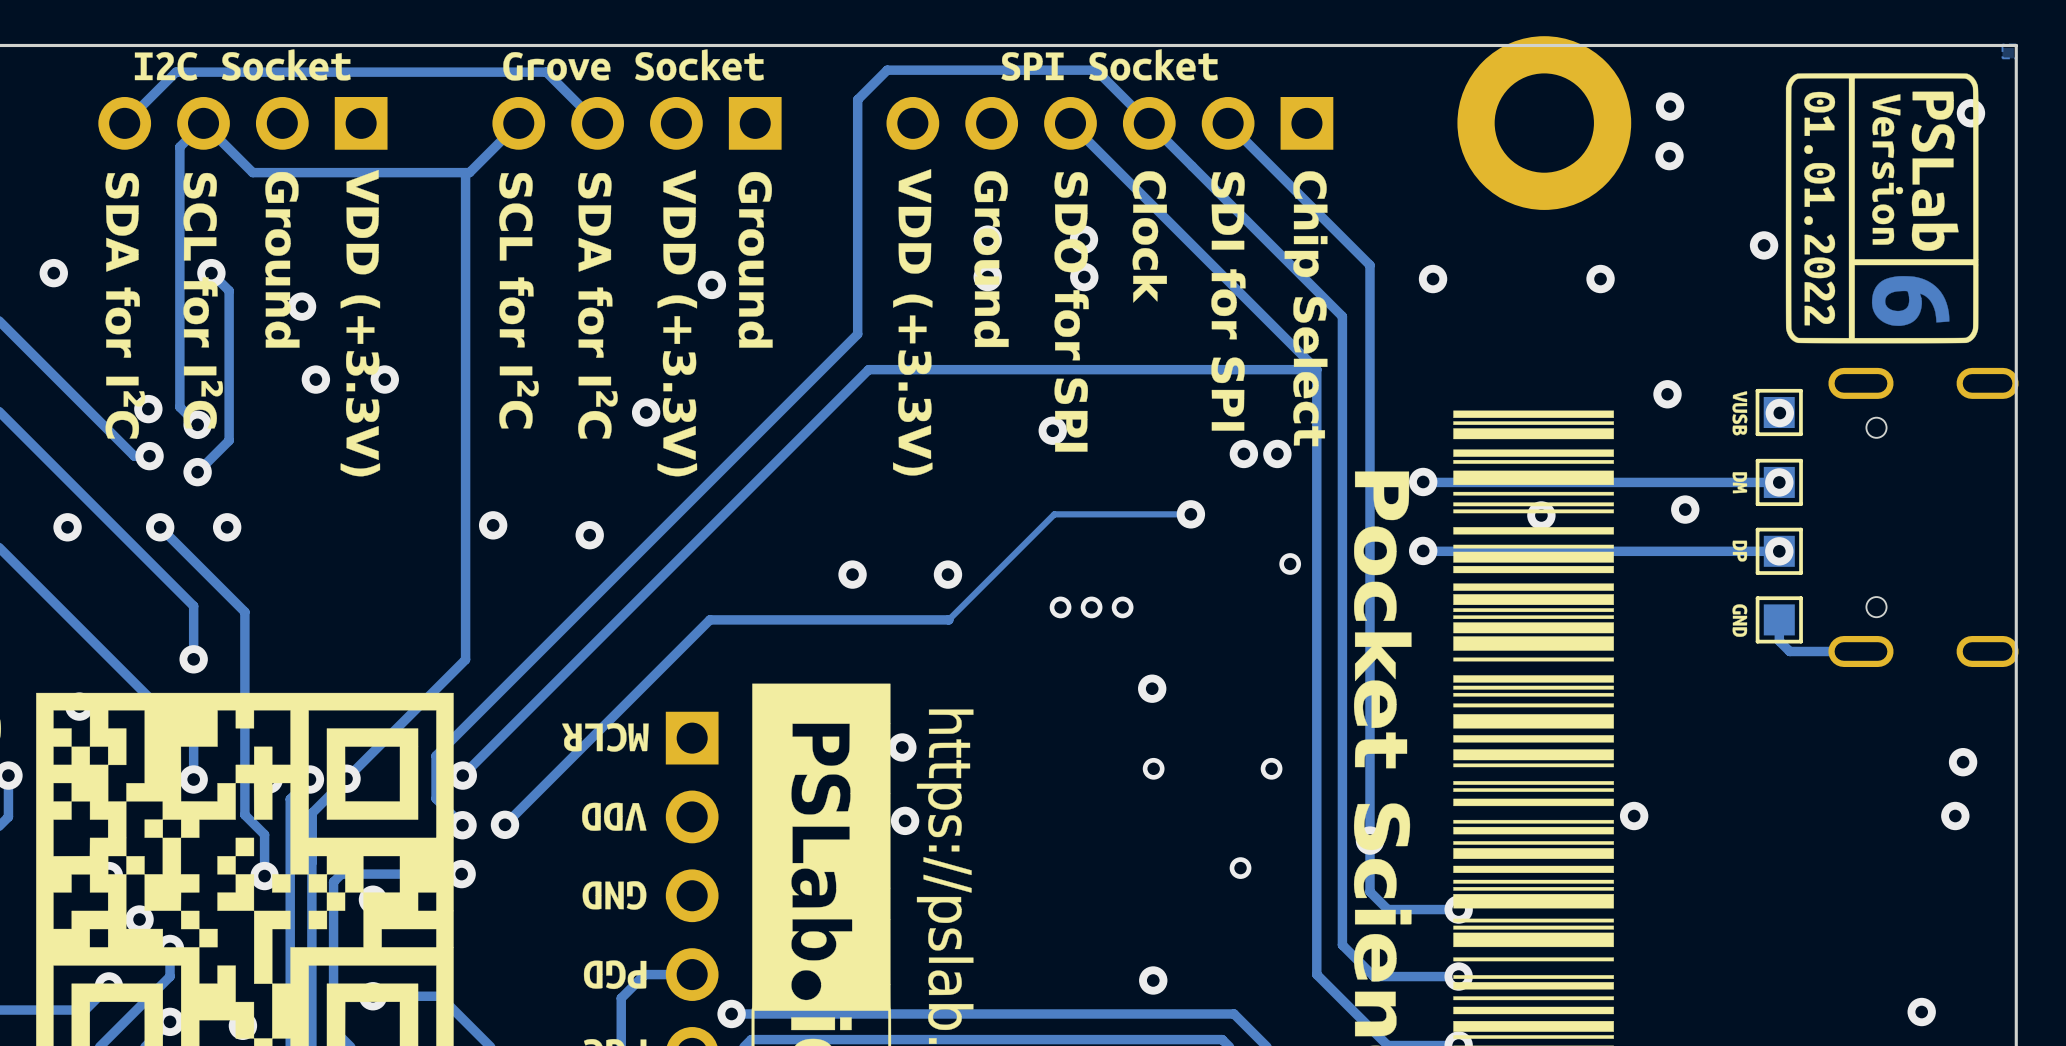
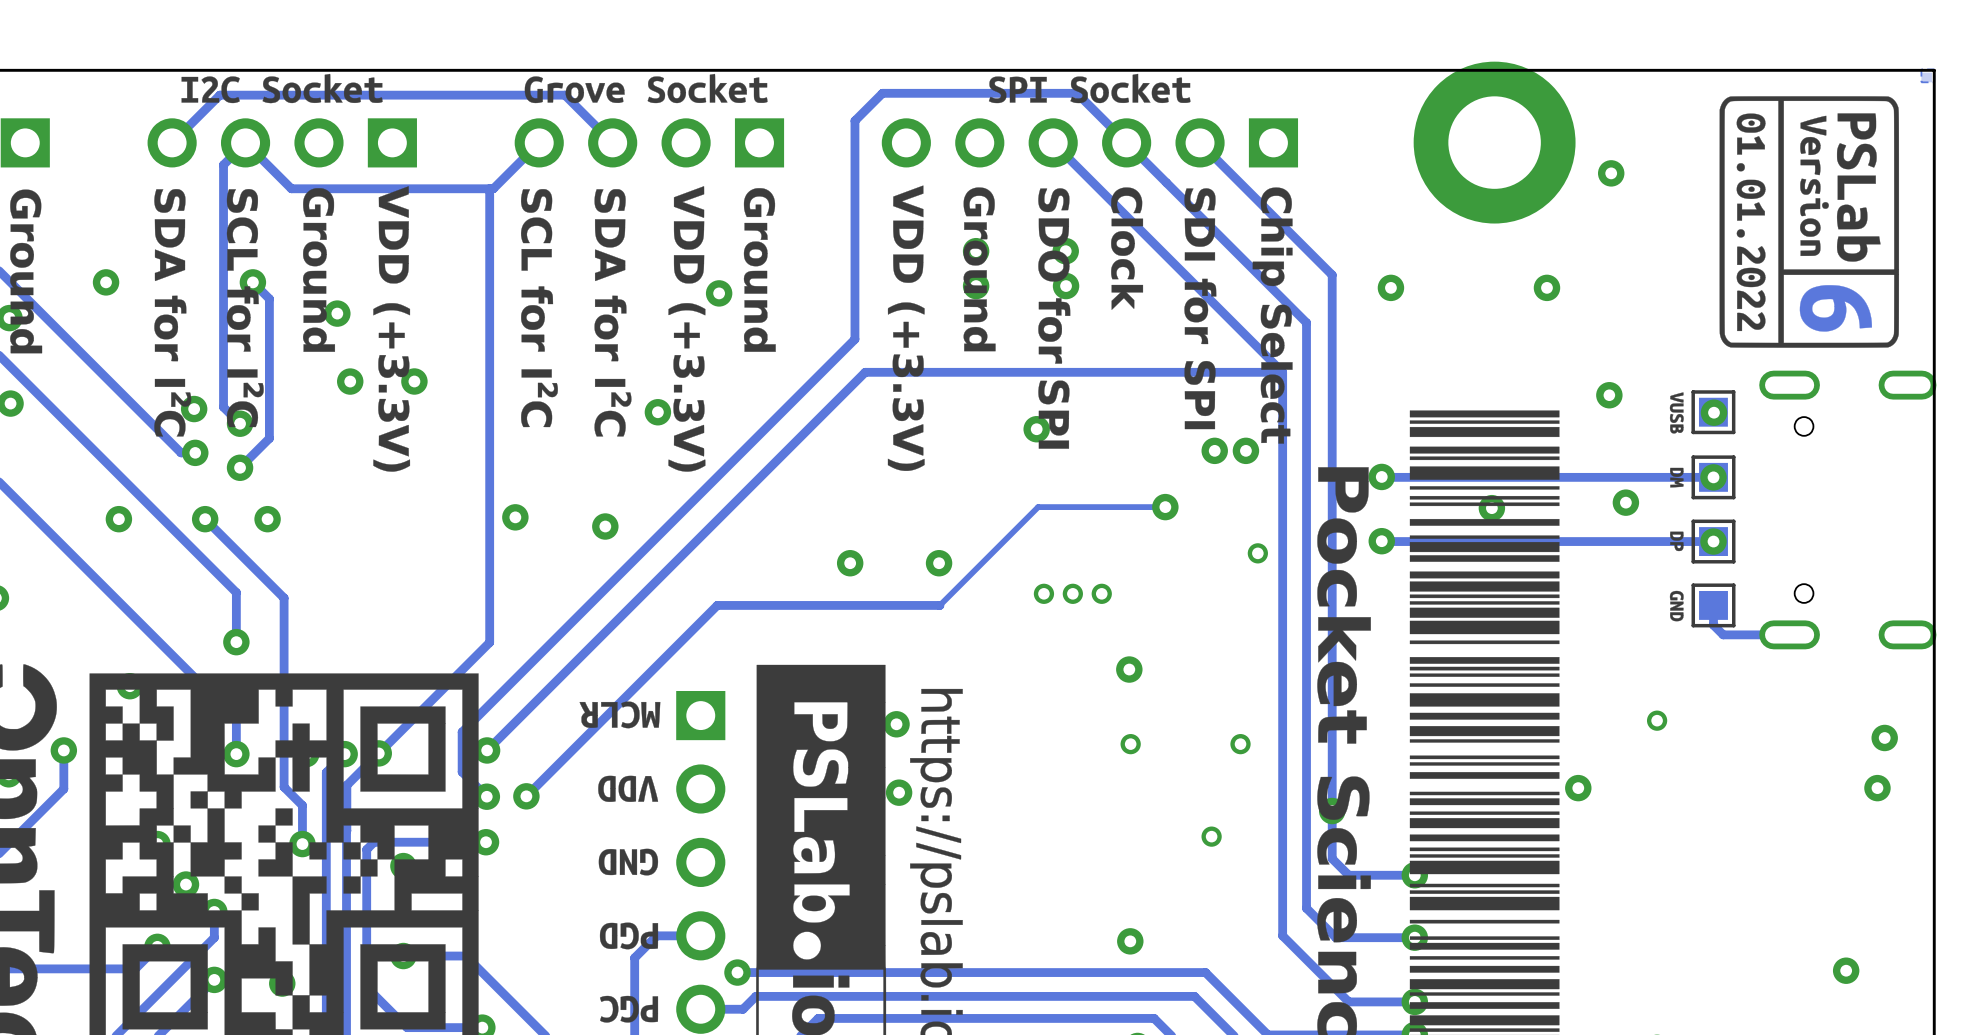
via: (1670, 106) -> none
via: (1970, 113) -> none
via: (1764, 245) -> none
via: none -> (1657, 720)

